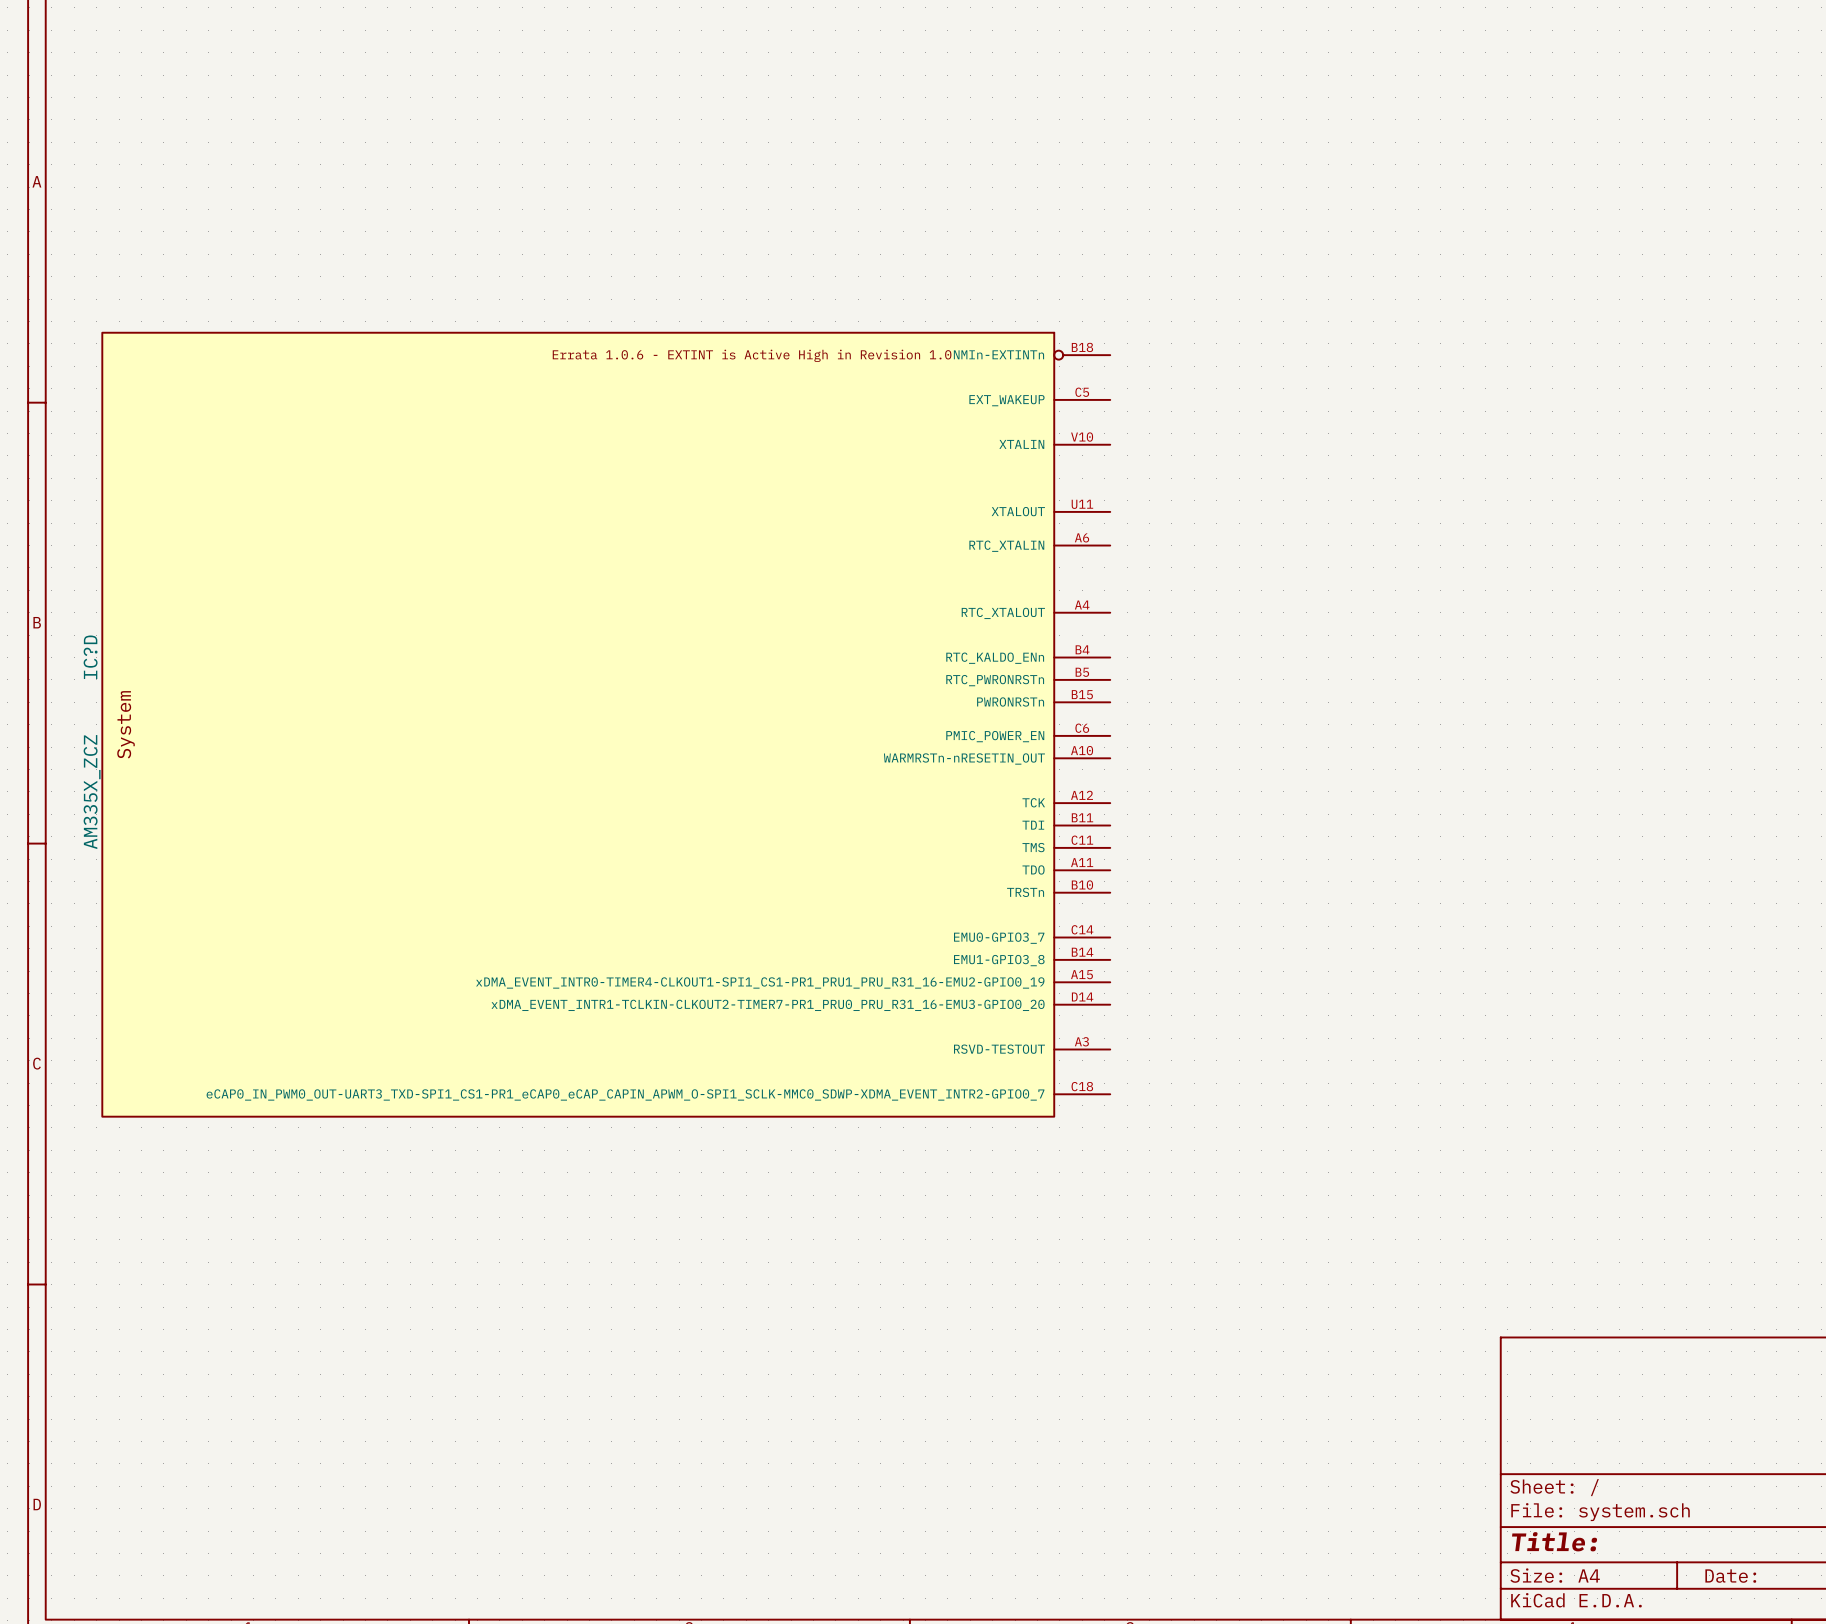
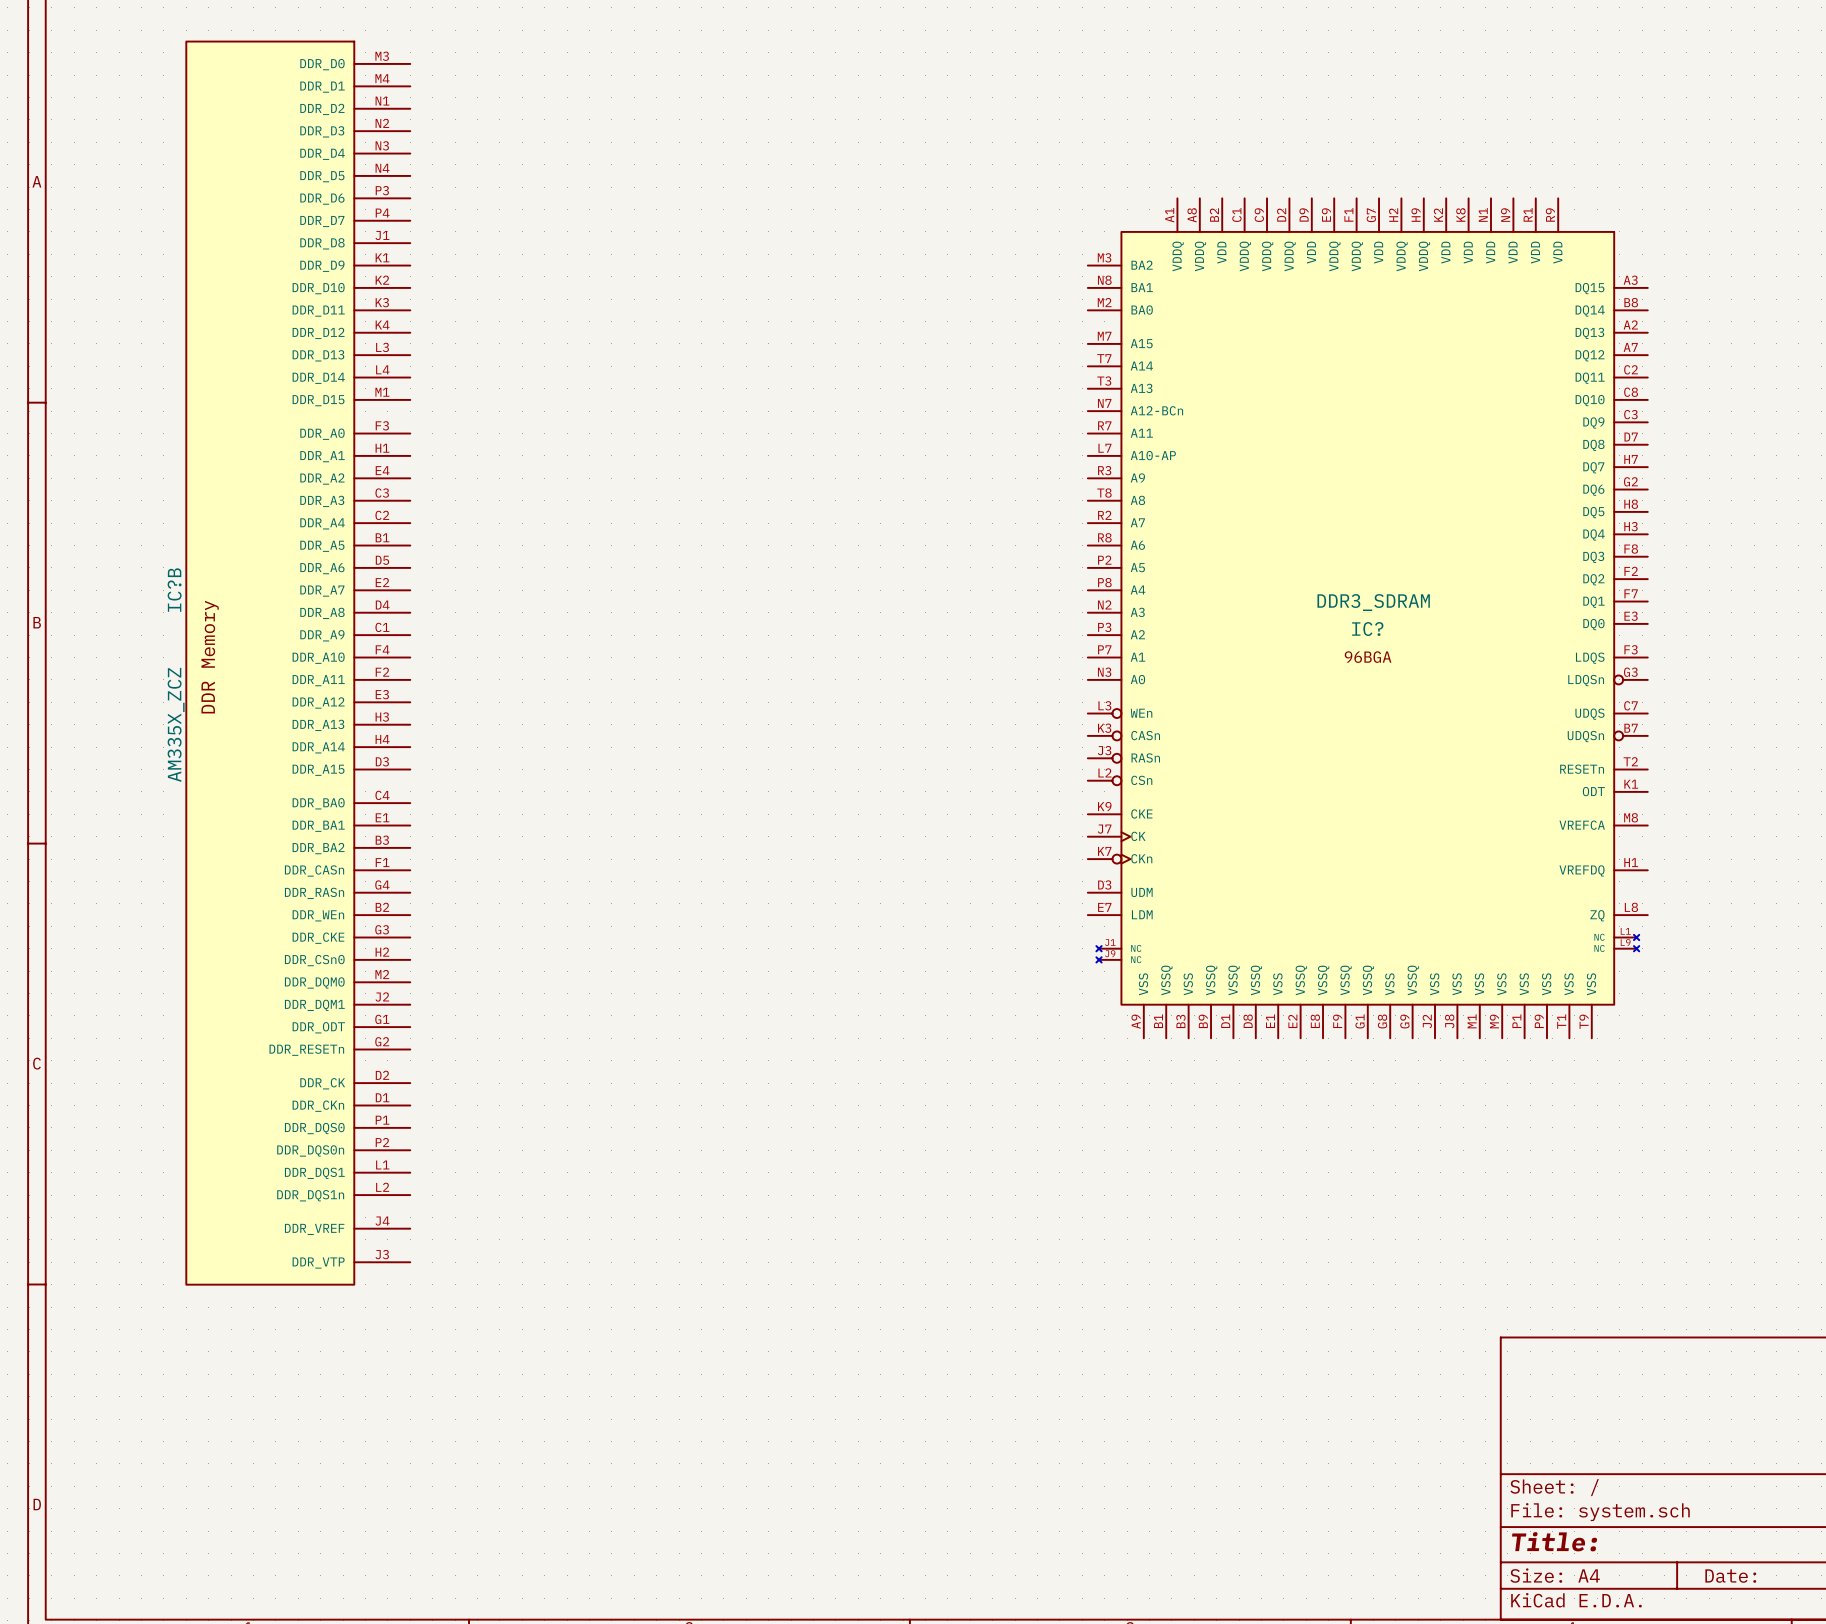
IC?: none -> DDR3_SDRAM (1367, 618)
IC?B: none -> AM335X_ZCZ (298, 663)
IC?D: AM335X_ZCZ (606, 724) -> none

